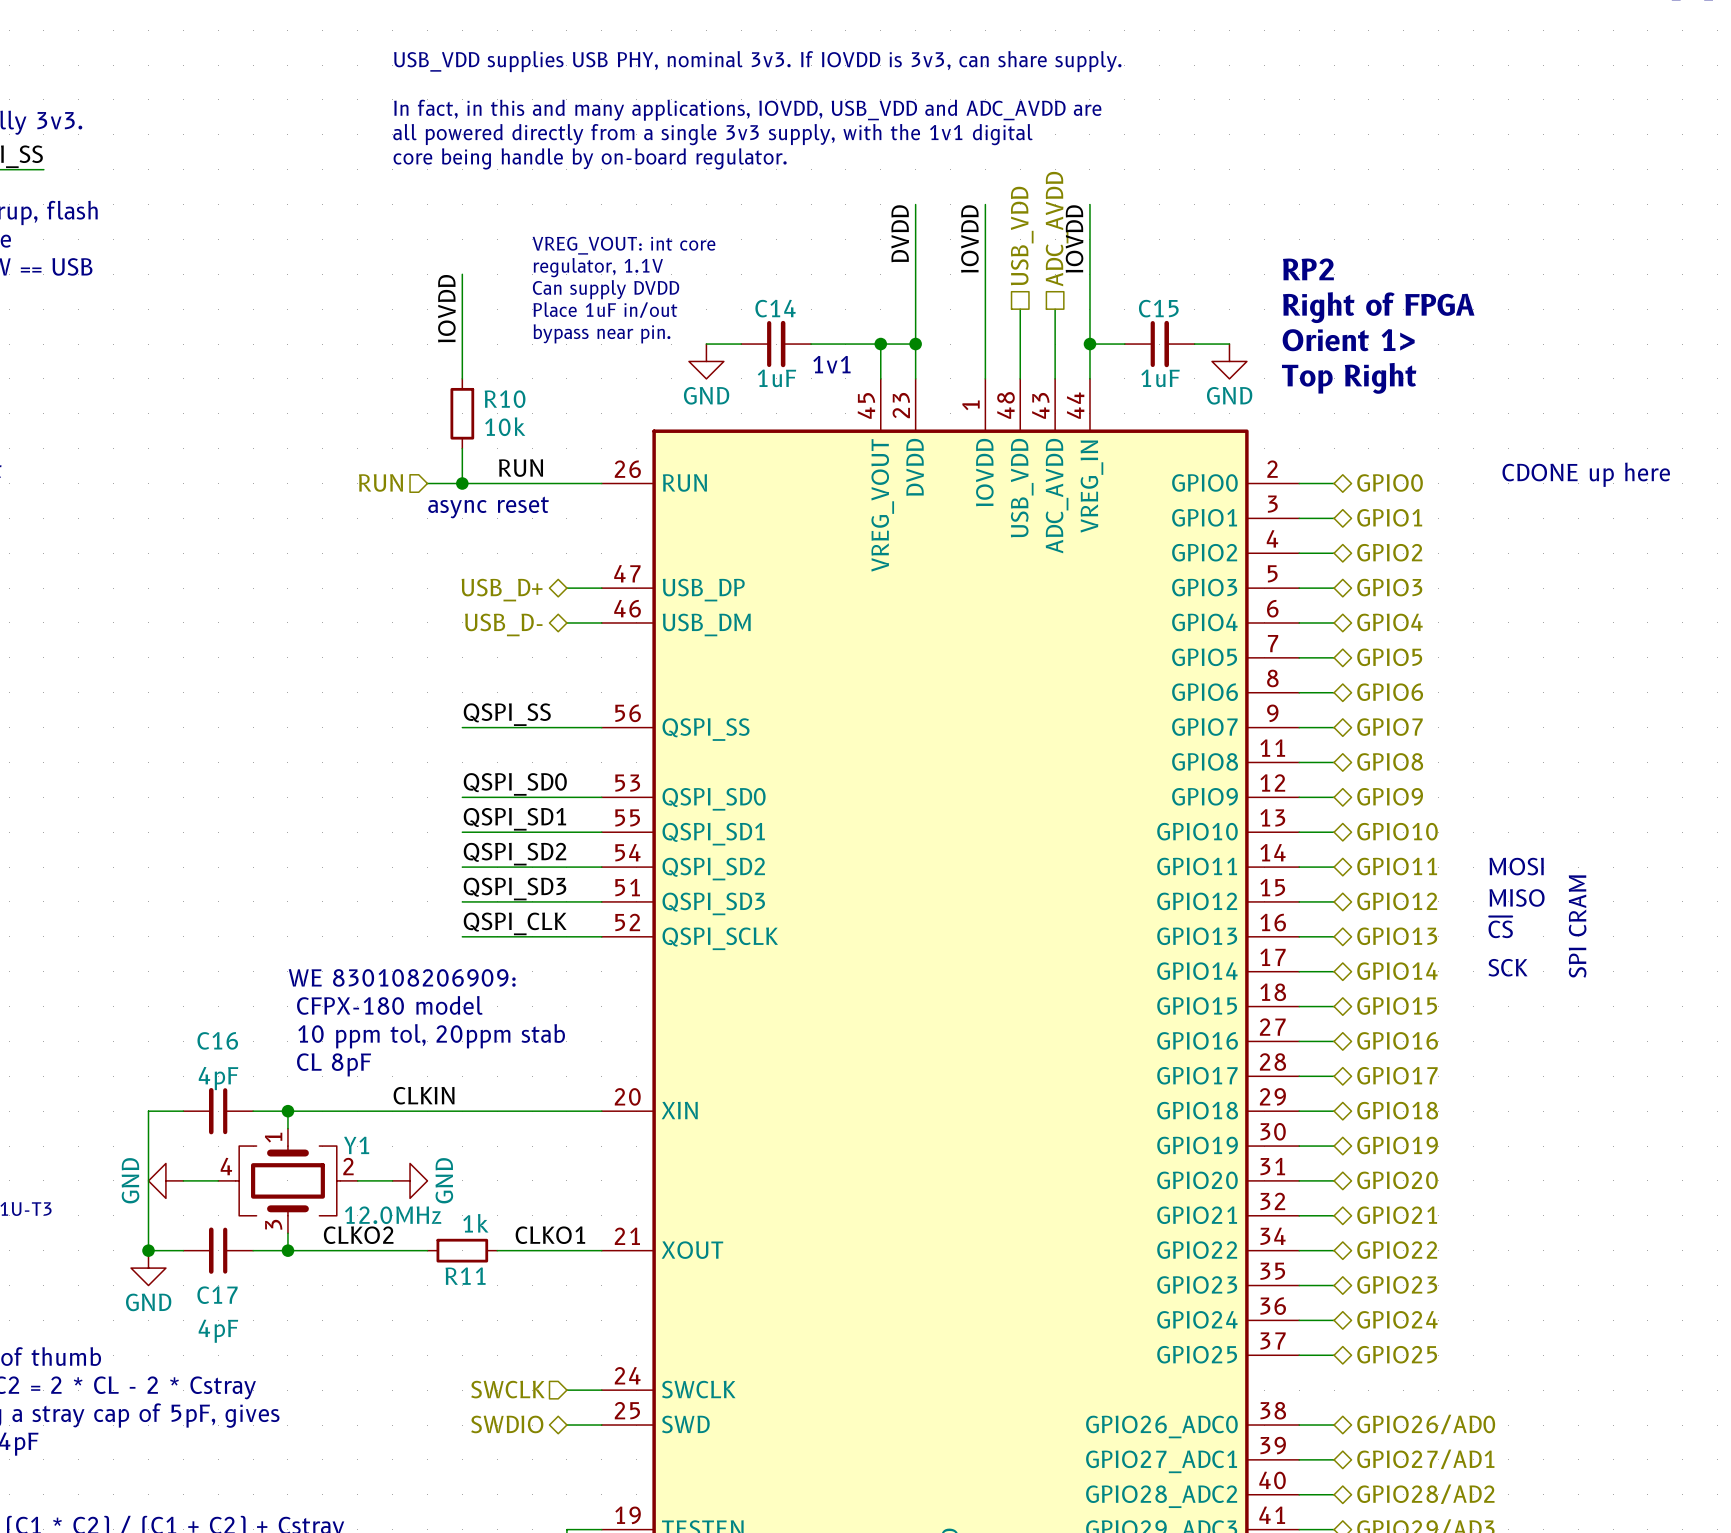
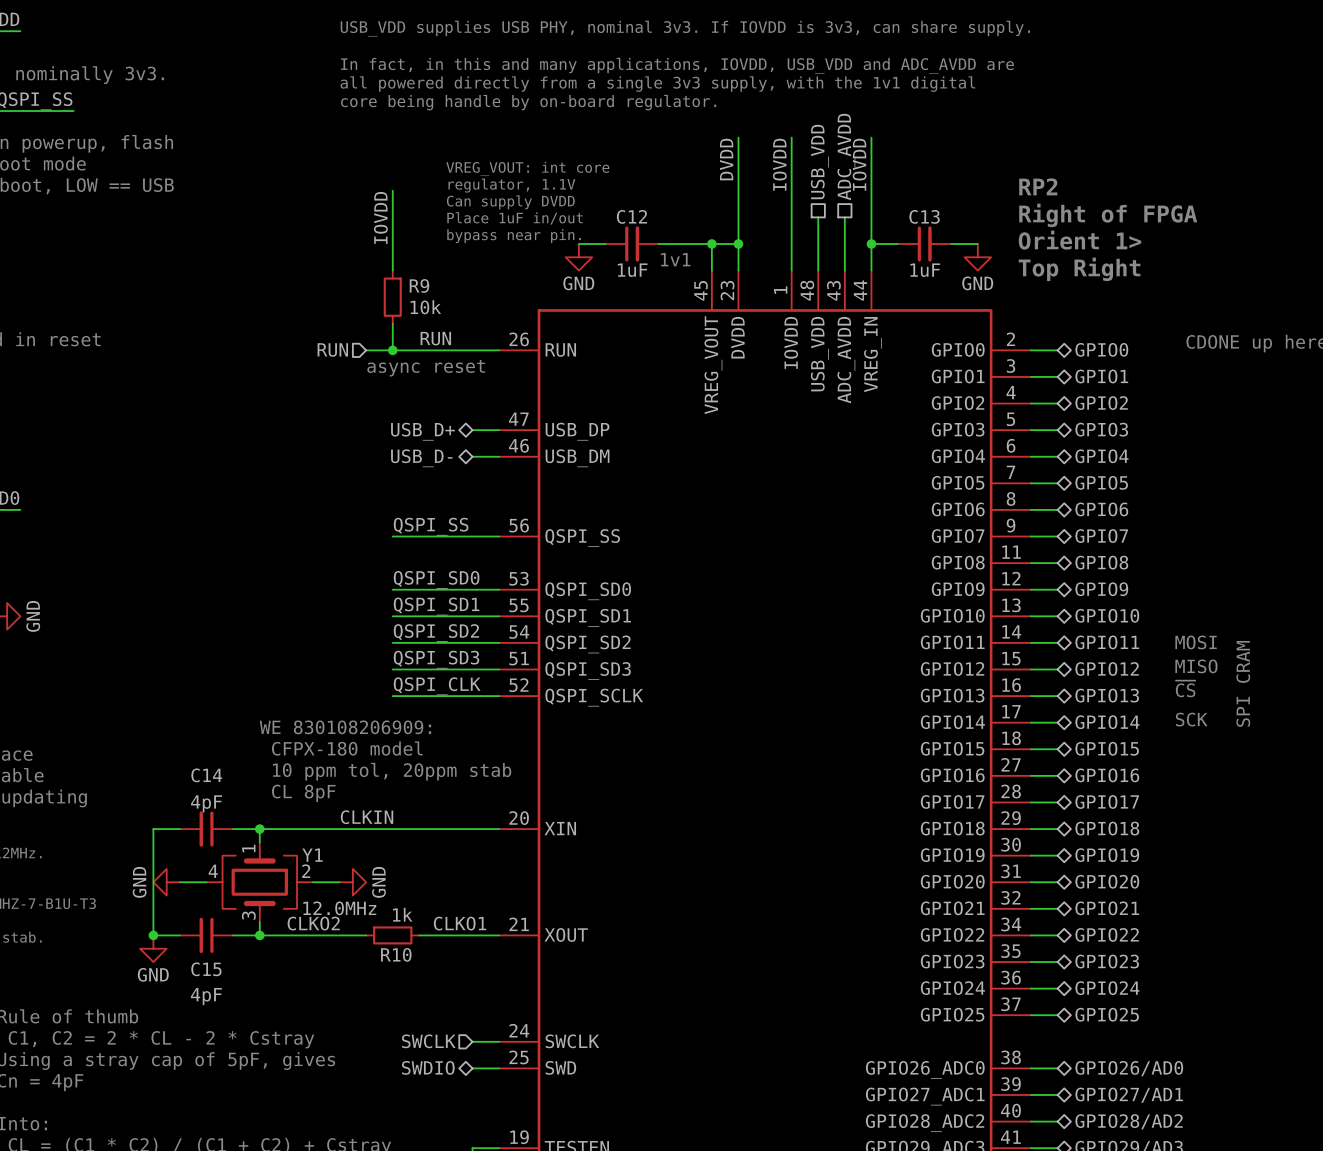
C14 name: C14 (775, 308) -> C12 (631, 216)
C15 name: C15 (1158, 308) -> C13 (924, 216)
R10 name: R10 (505, 399) -> R9 (419, 285)
C16 name: C16 (217, 1040) -> C14 (206, 775)
R11 name: R11 (465, 1276) -> R10 (396, 954)
C17 name: C17 (217, 1295) -> C15 (206, 969)

